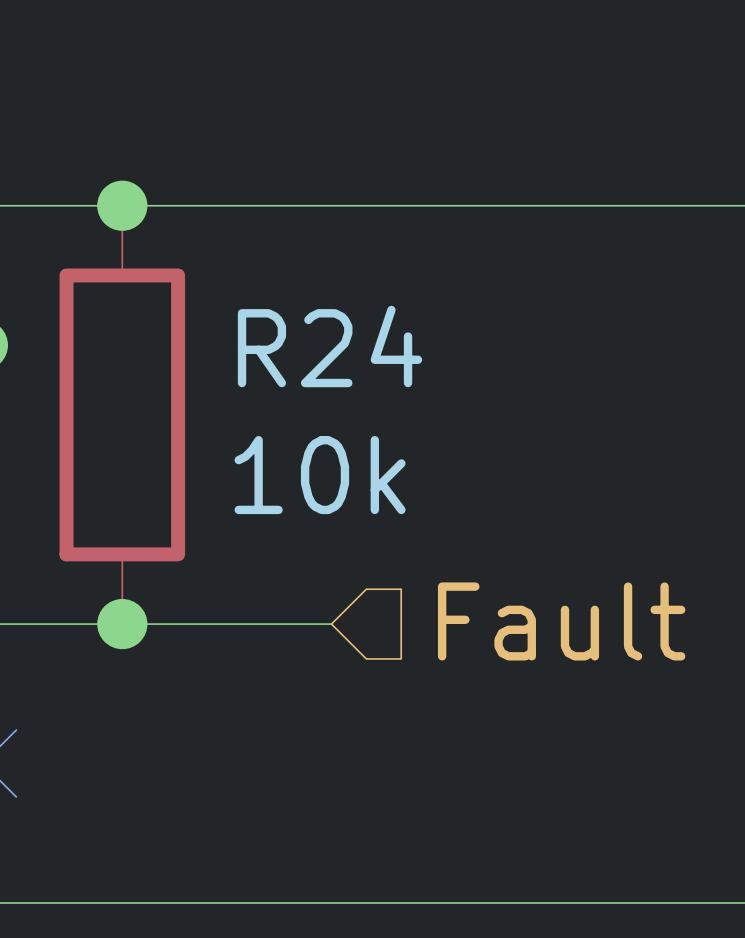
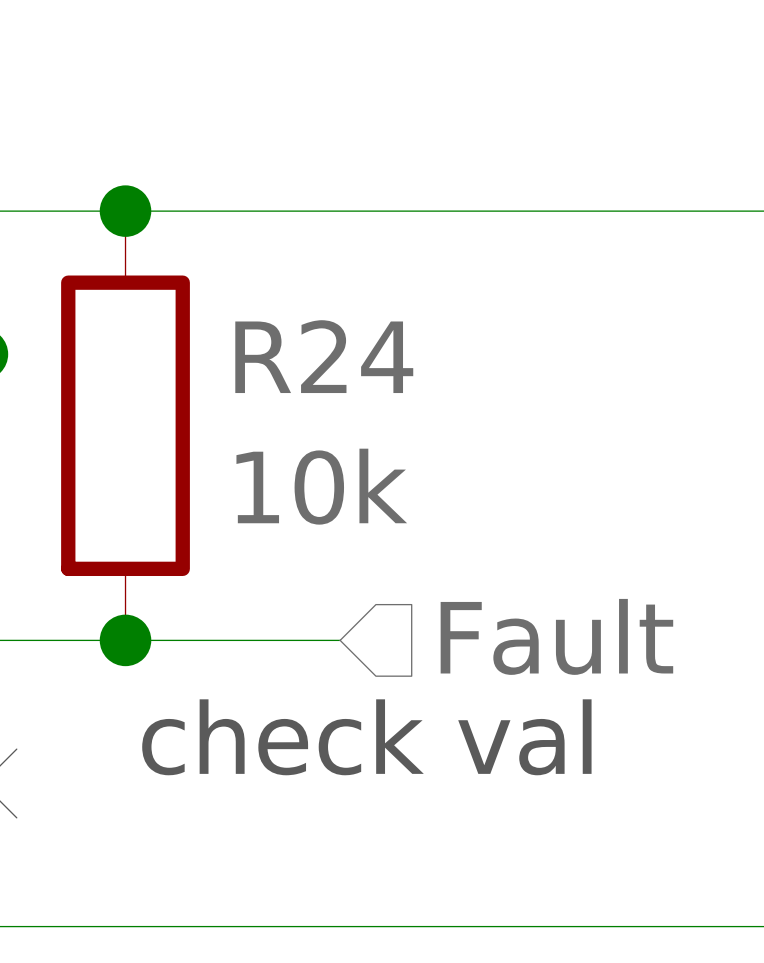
text: none -> check val (366, 737)

